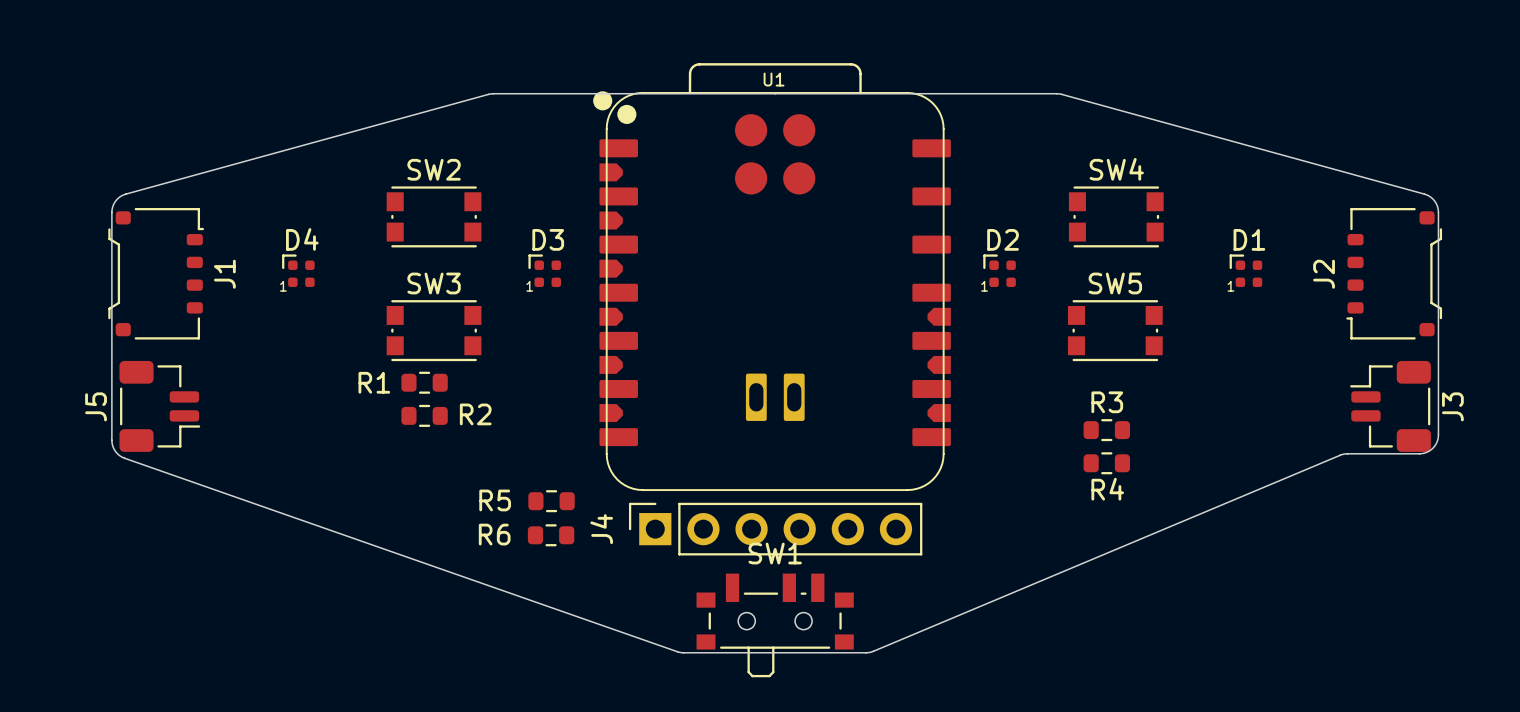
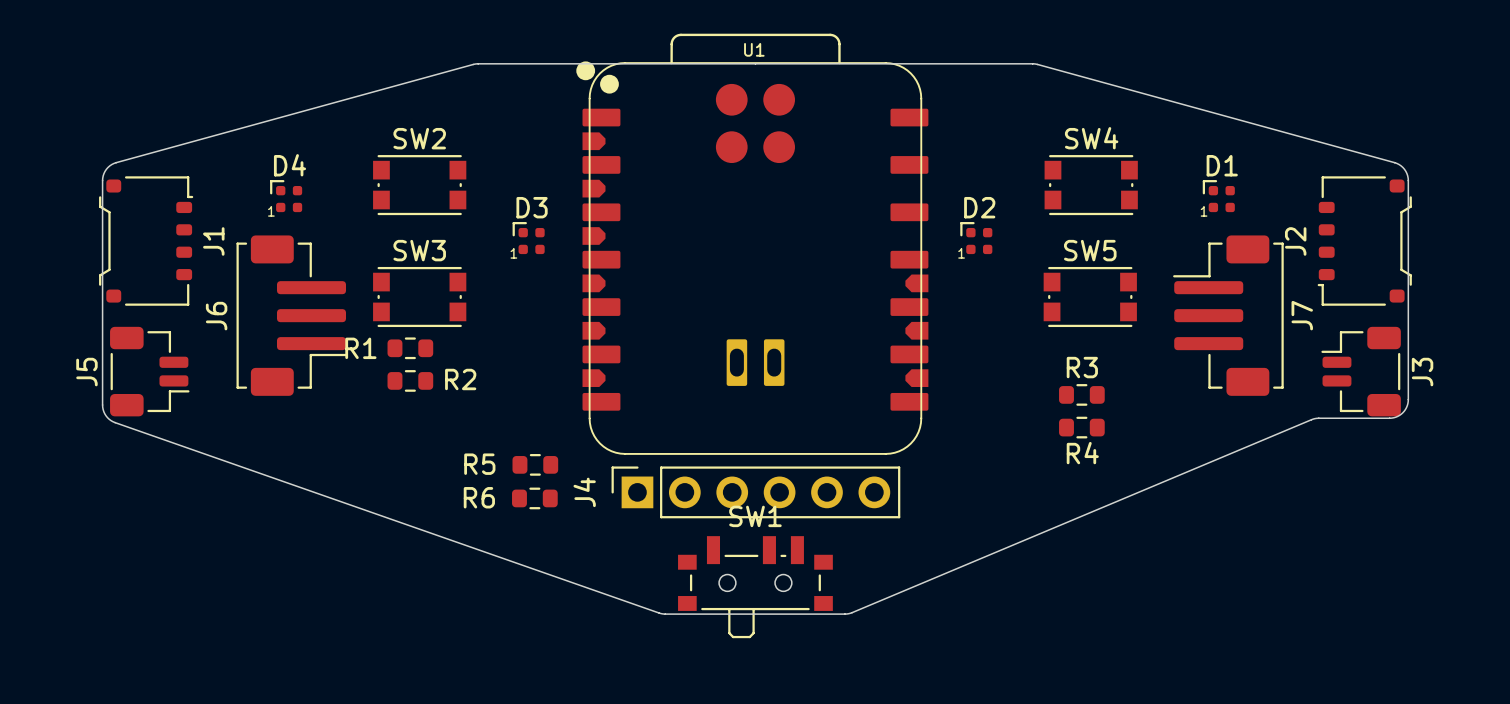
D4 position: (298, 270) -> (286, 196)
D1 position: (1245, 270) -> (1218, 196)
J6: none -> (291, 315)
J7: none -> (1228, 315)

